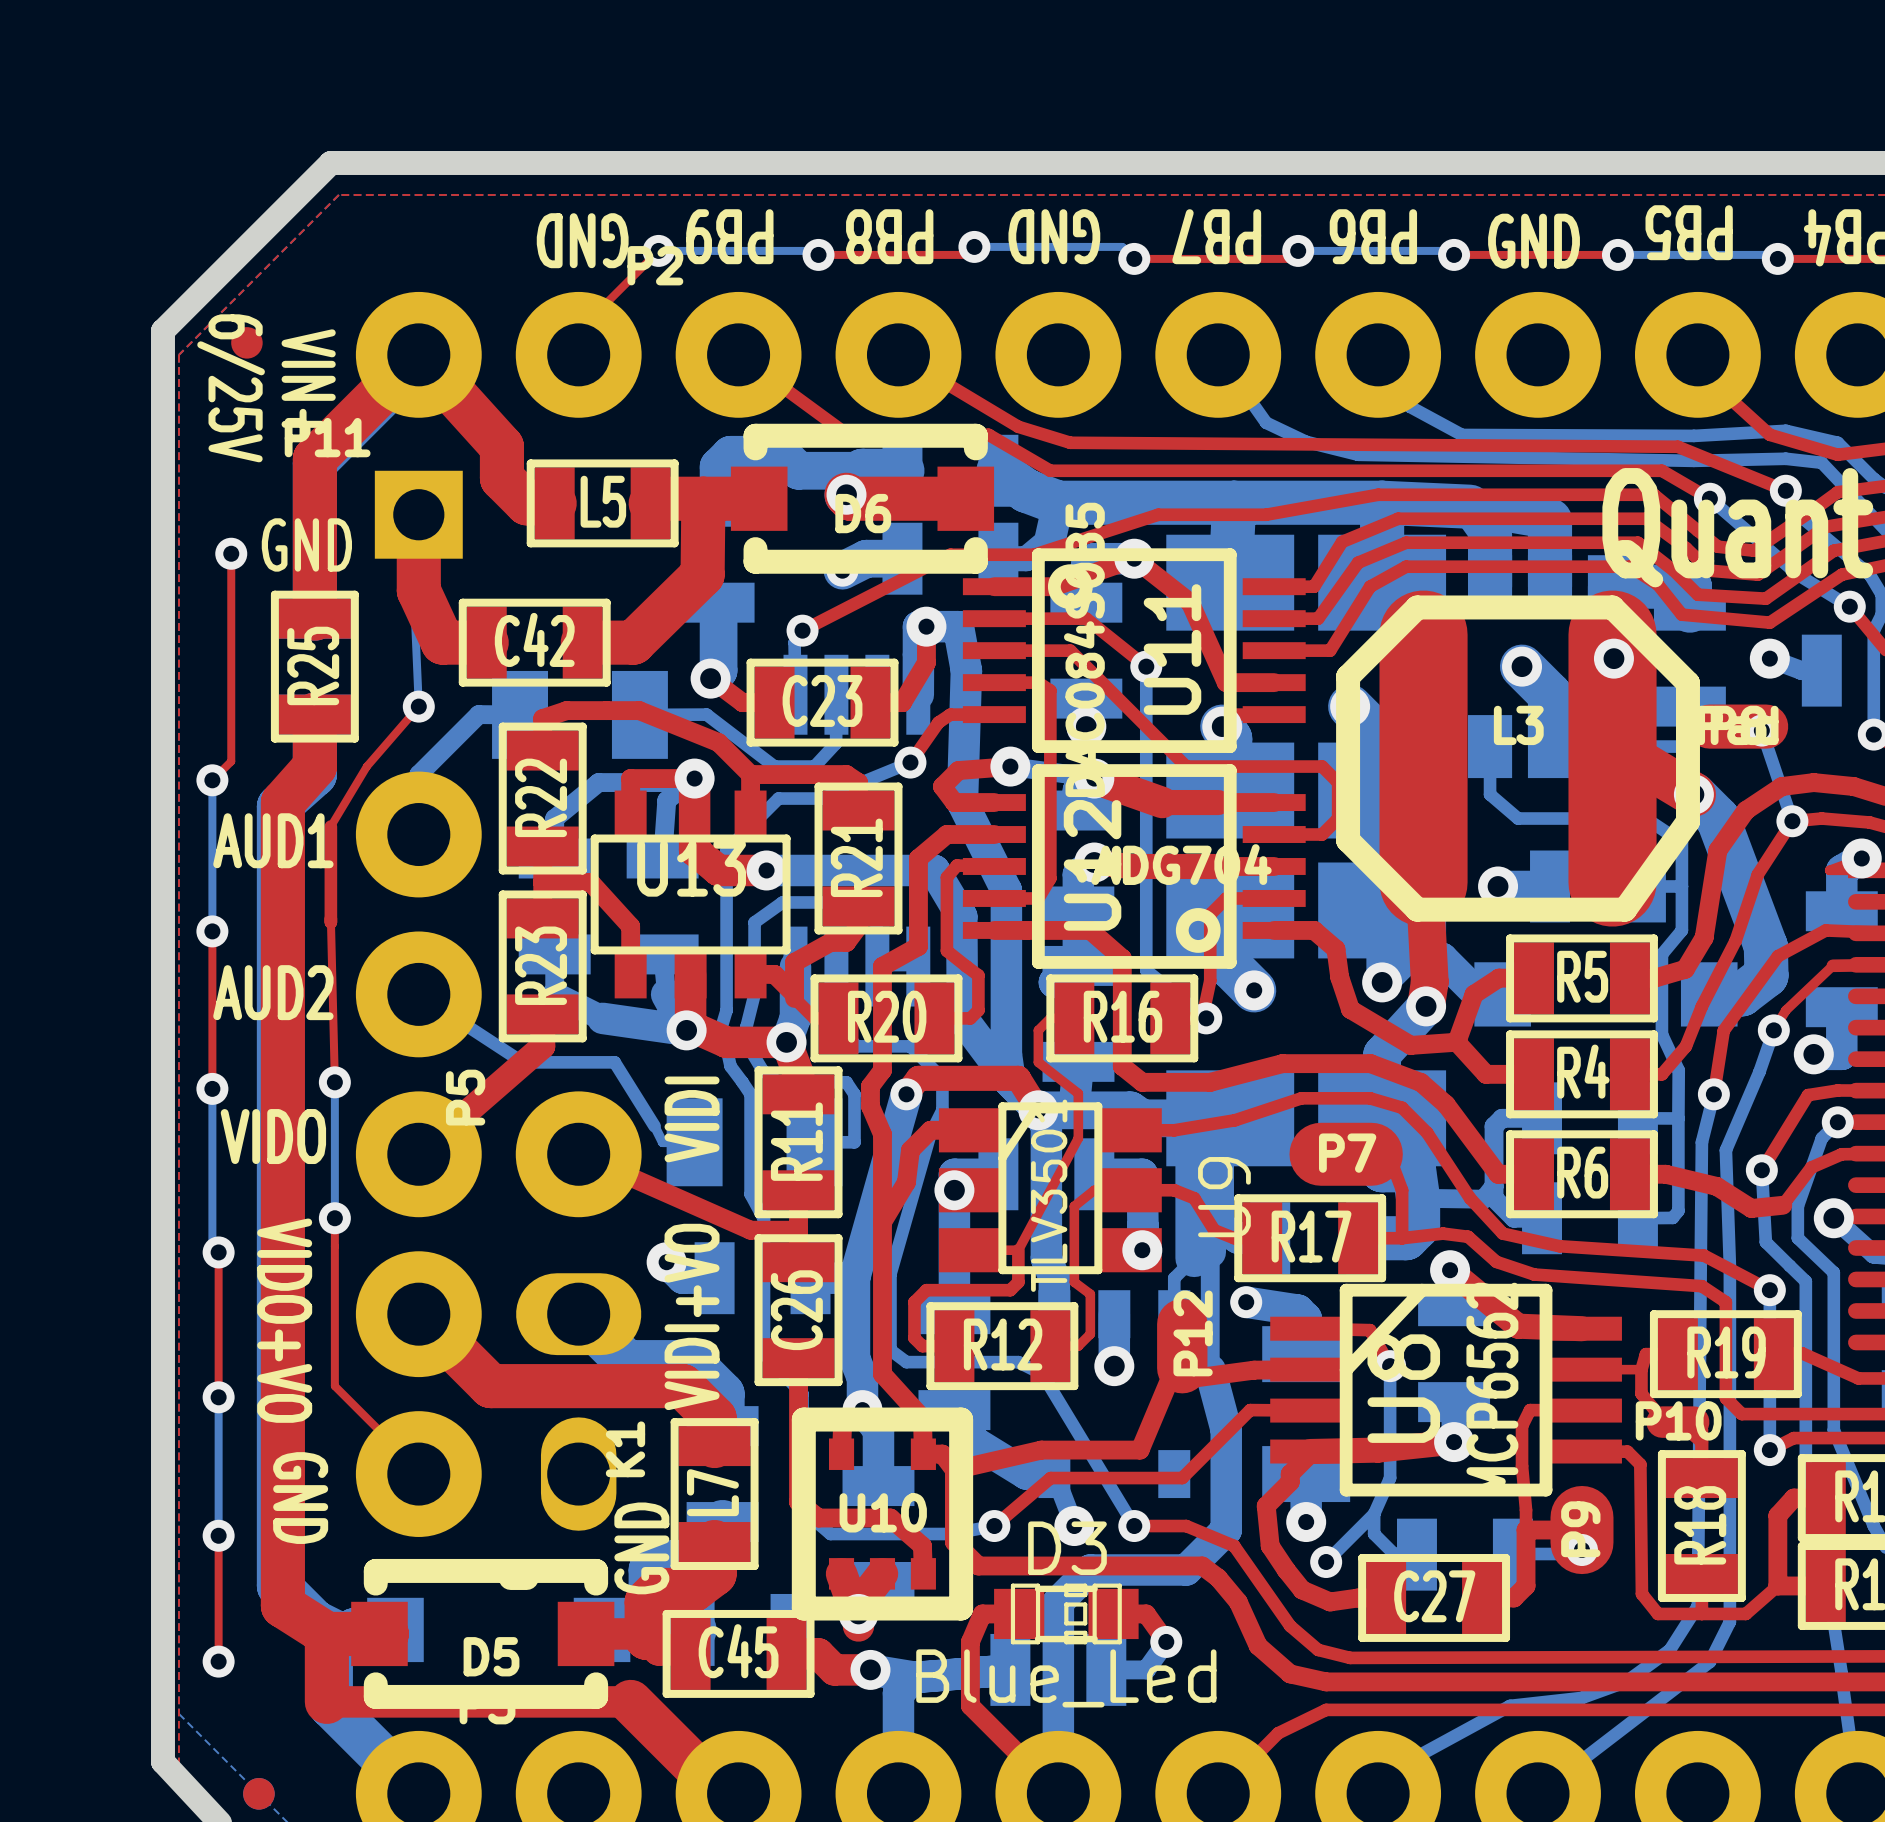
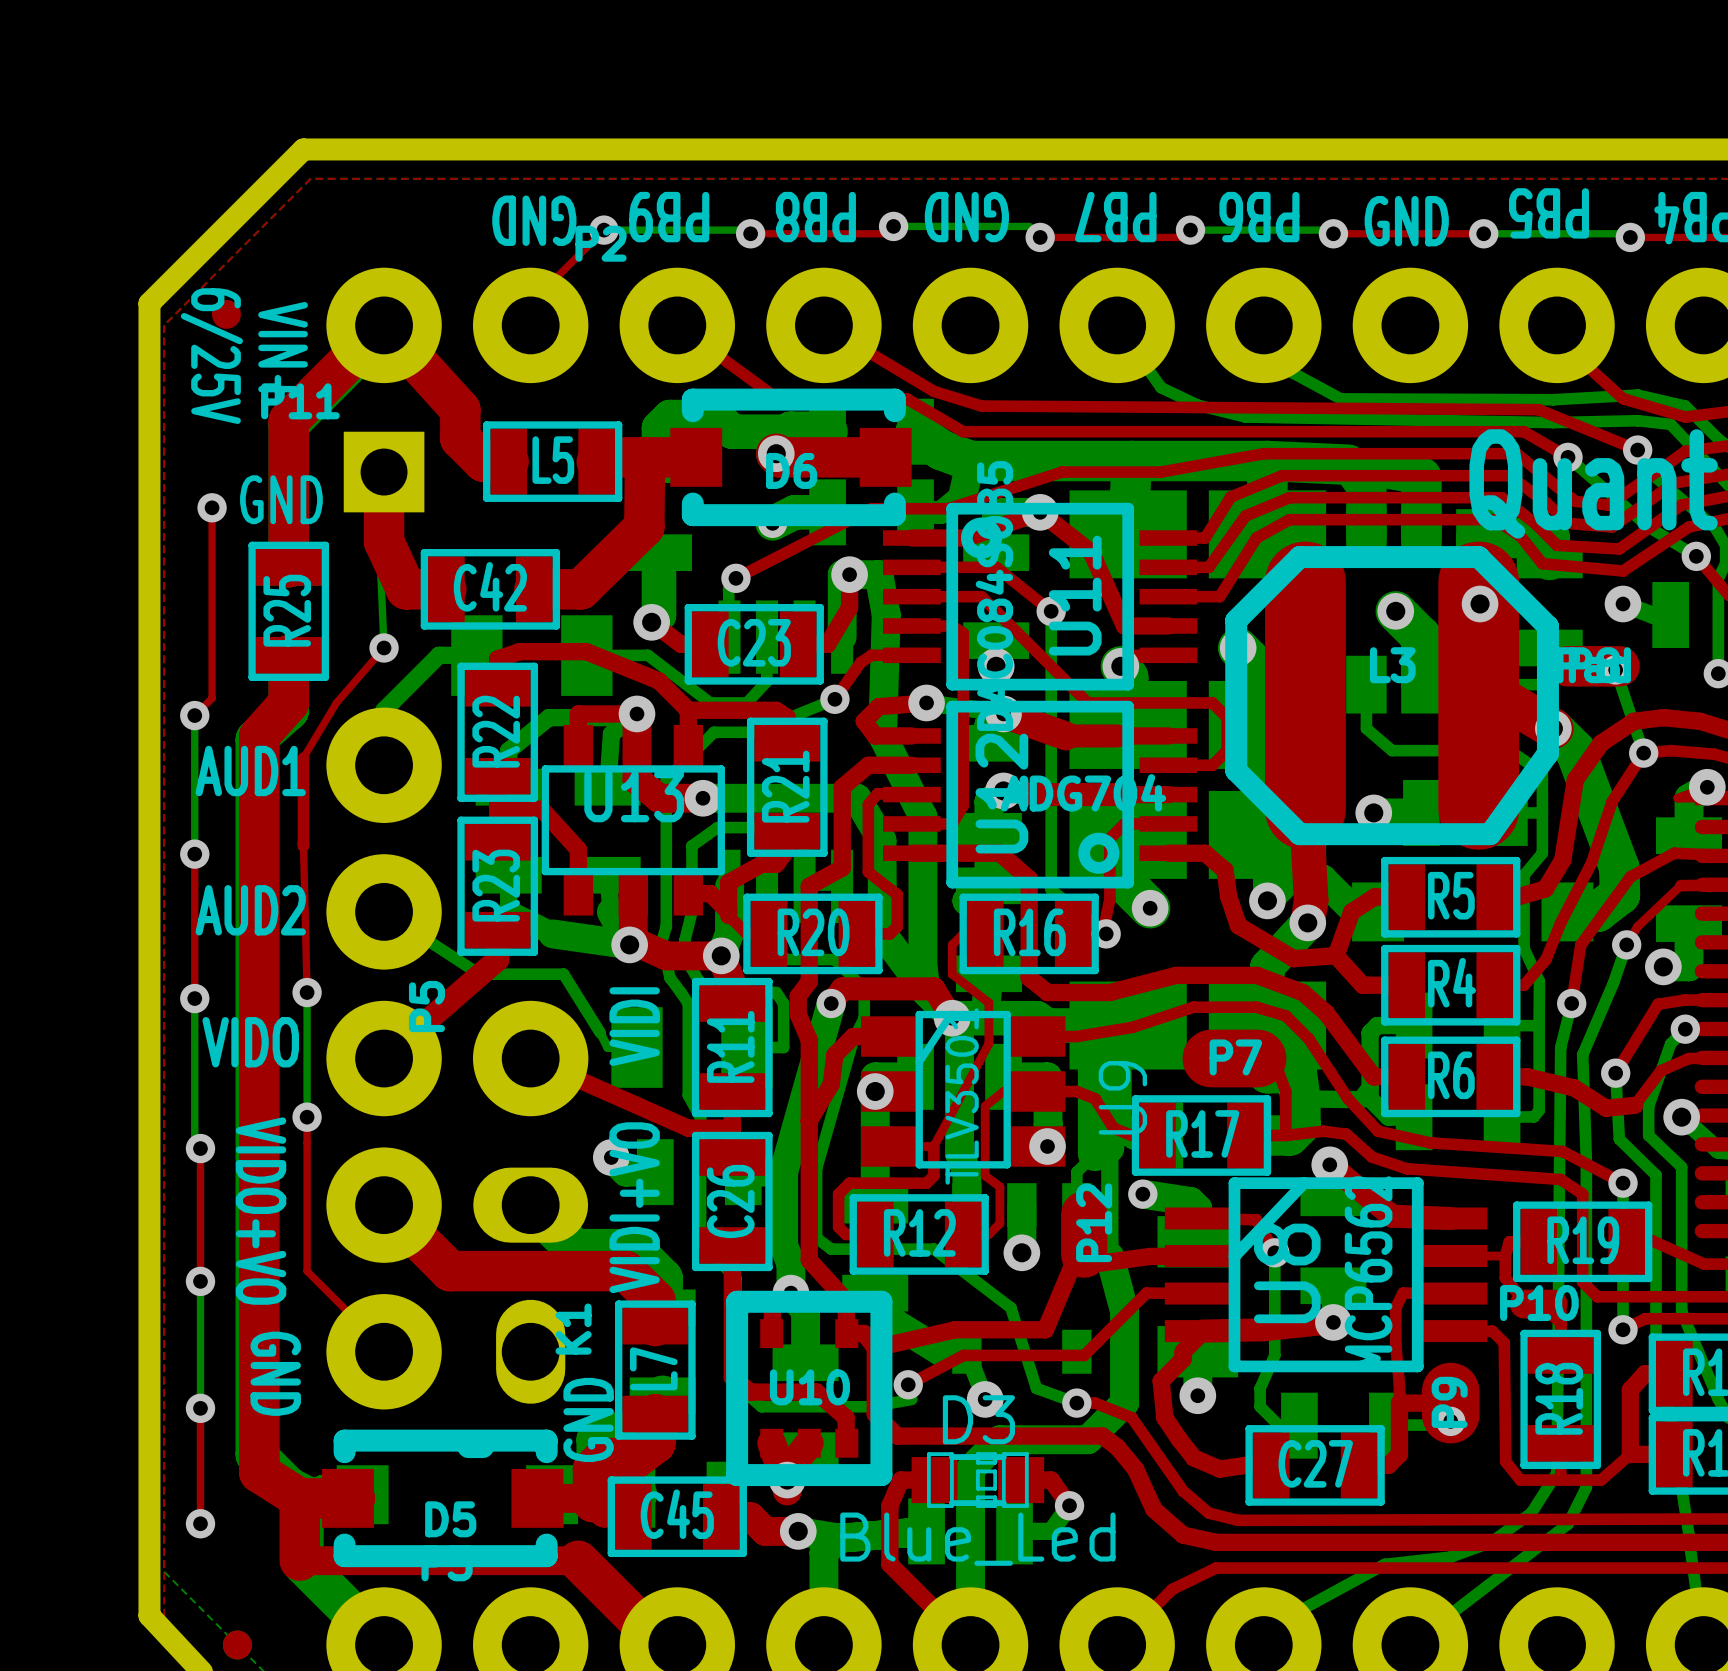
bottom track: (1018, 1362) (1042, 1374) (1134, 1526) -> (933, 1249) (1010, 1307) (1036, 1388) (1076, 1403)
top track: (1050, 1478) (994, 1526) -> (963, 1355) (908, 1384)
bottom track: (1374, 1514) (1326, 1562) -> none
via position: (994, 1526) -> (908, 1384)
top track: (1134, 1526) (1186, 1526) (1234, 1546) -> (1076, 1403) (1095, 1403) (1131, 1417)
via position: (1134, 1526) -> (1076, 1403)
via: (1326, 1562) -> none

